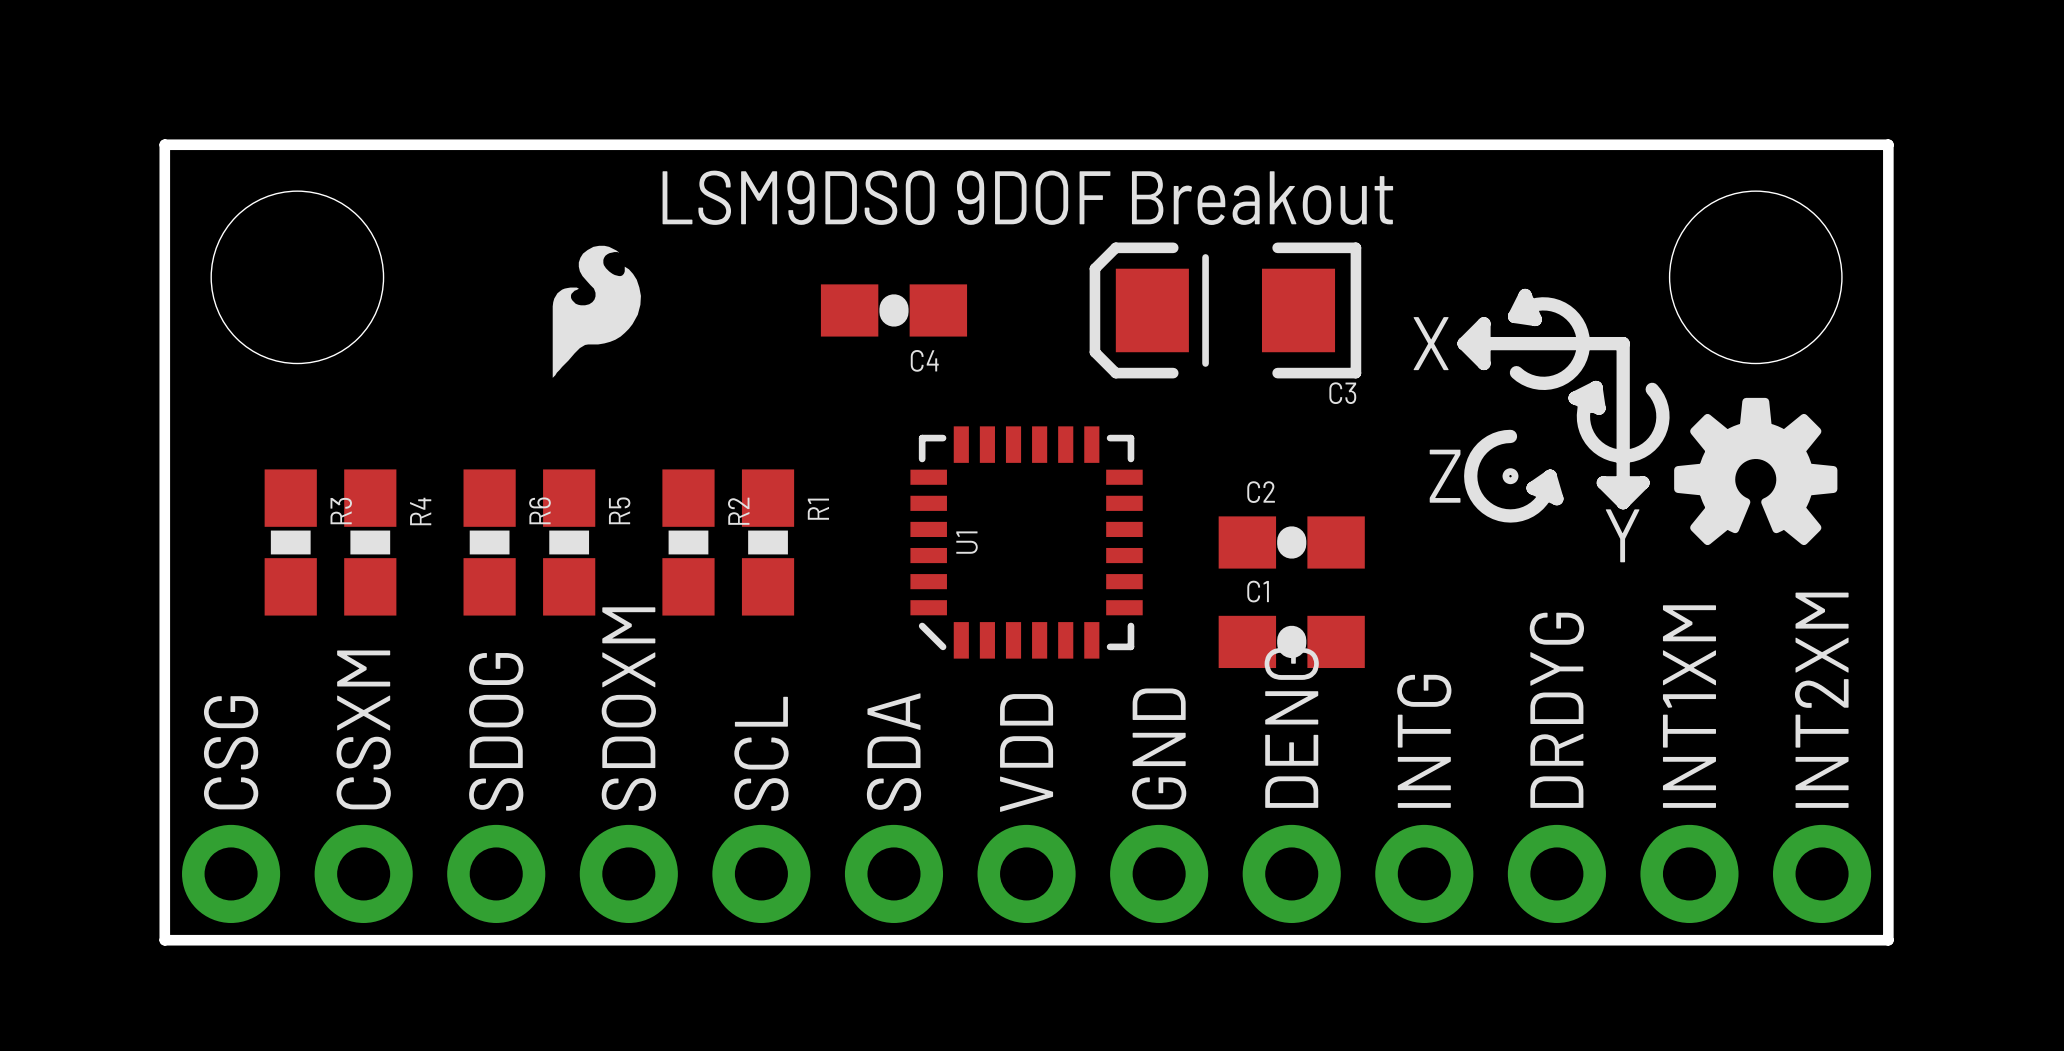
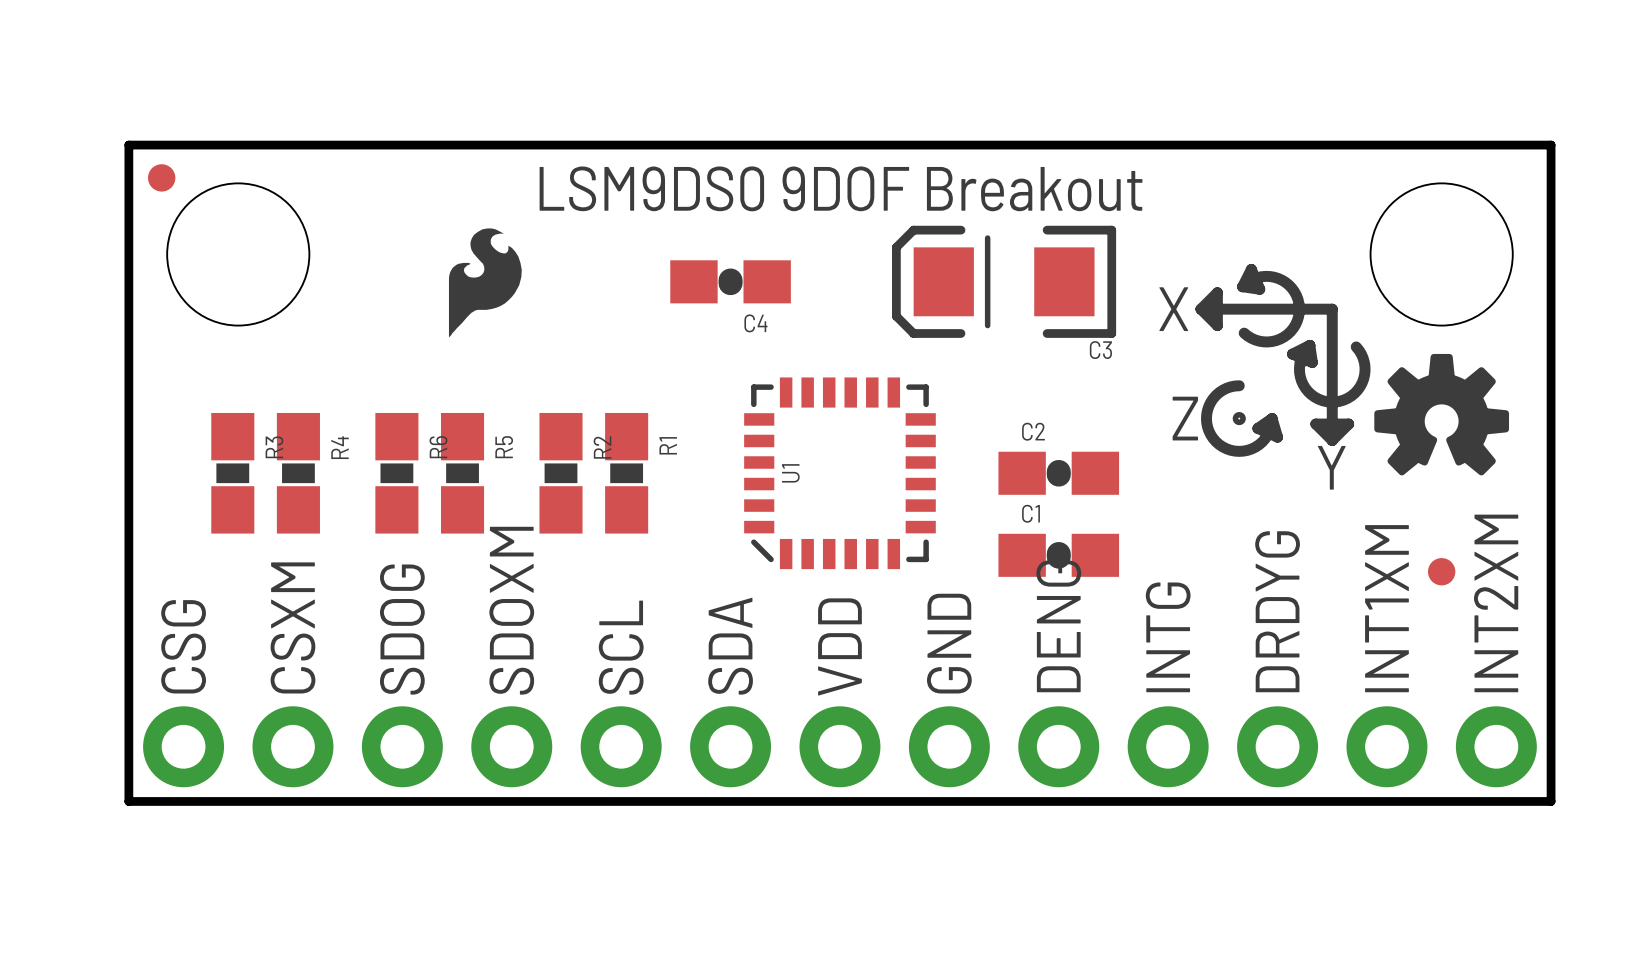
part: none -> (161, 177)
part: none -> (1441, 571)

